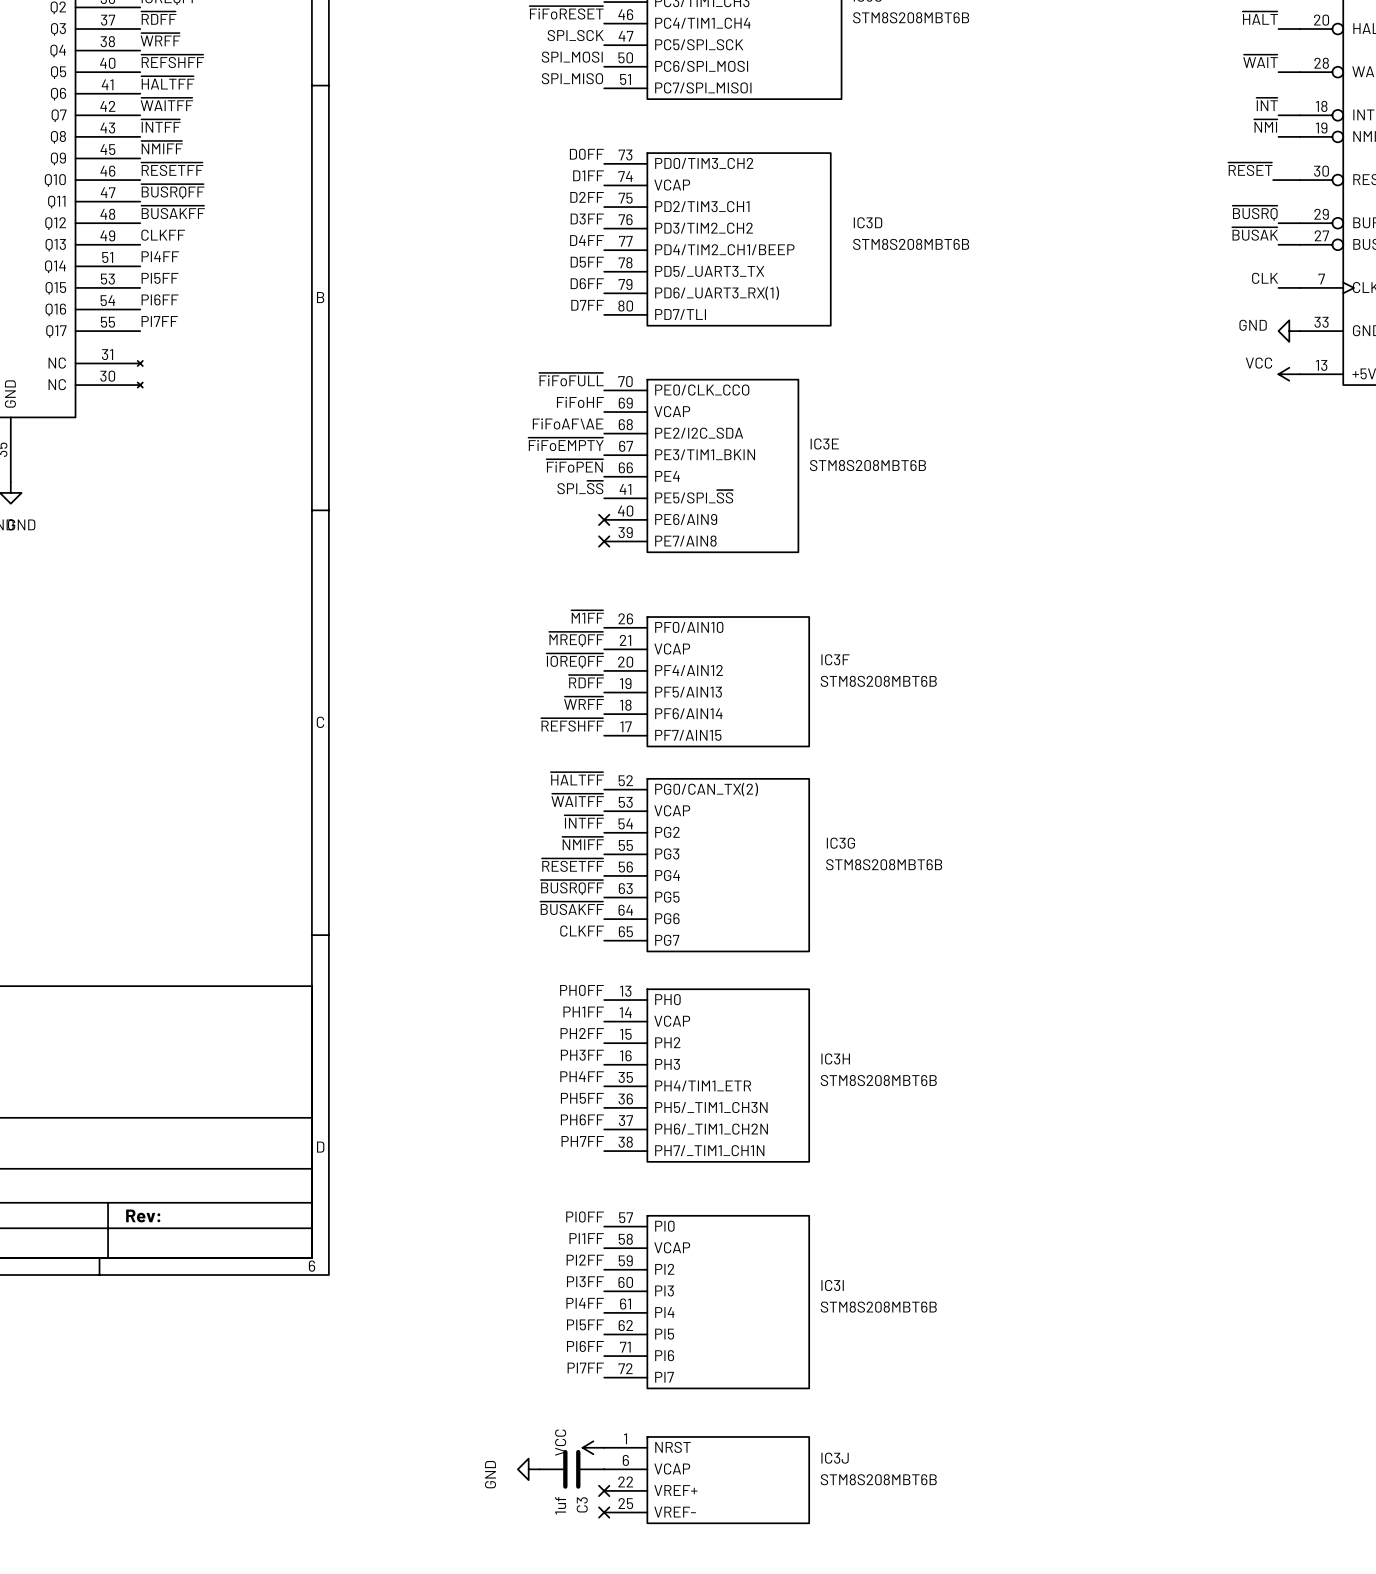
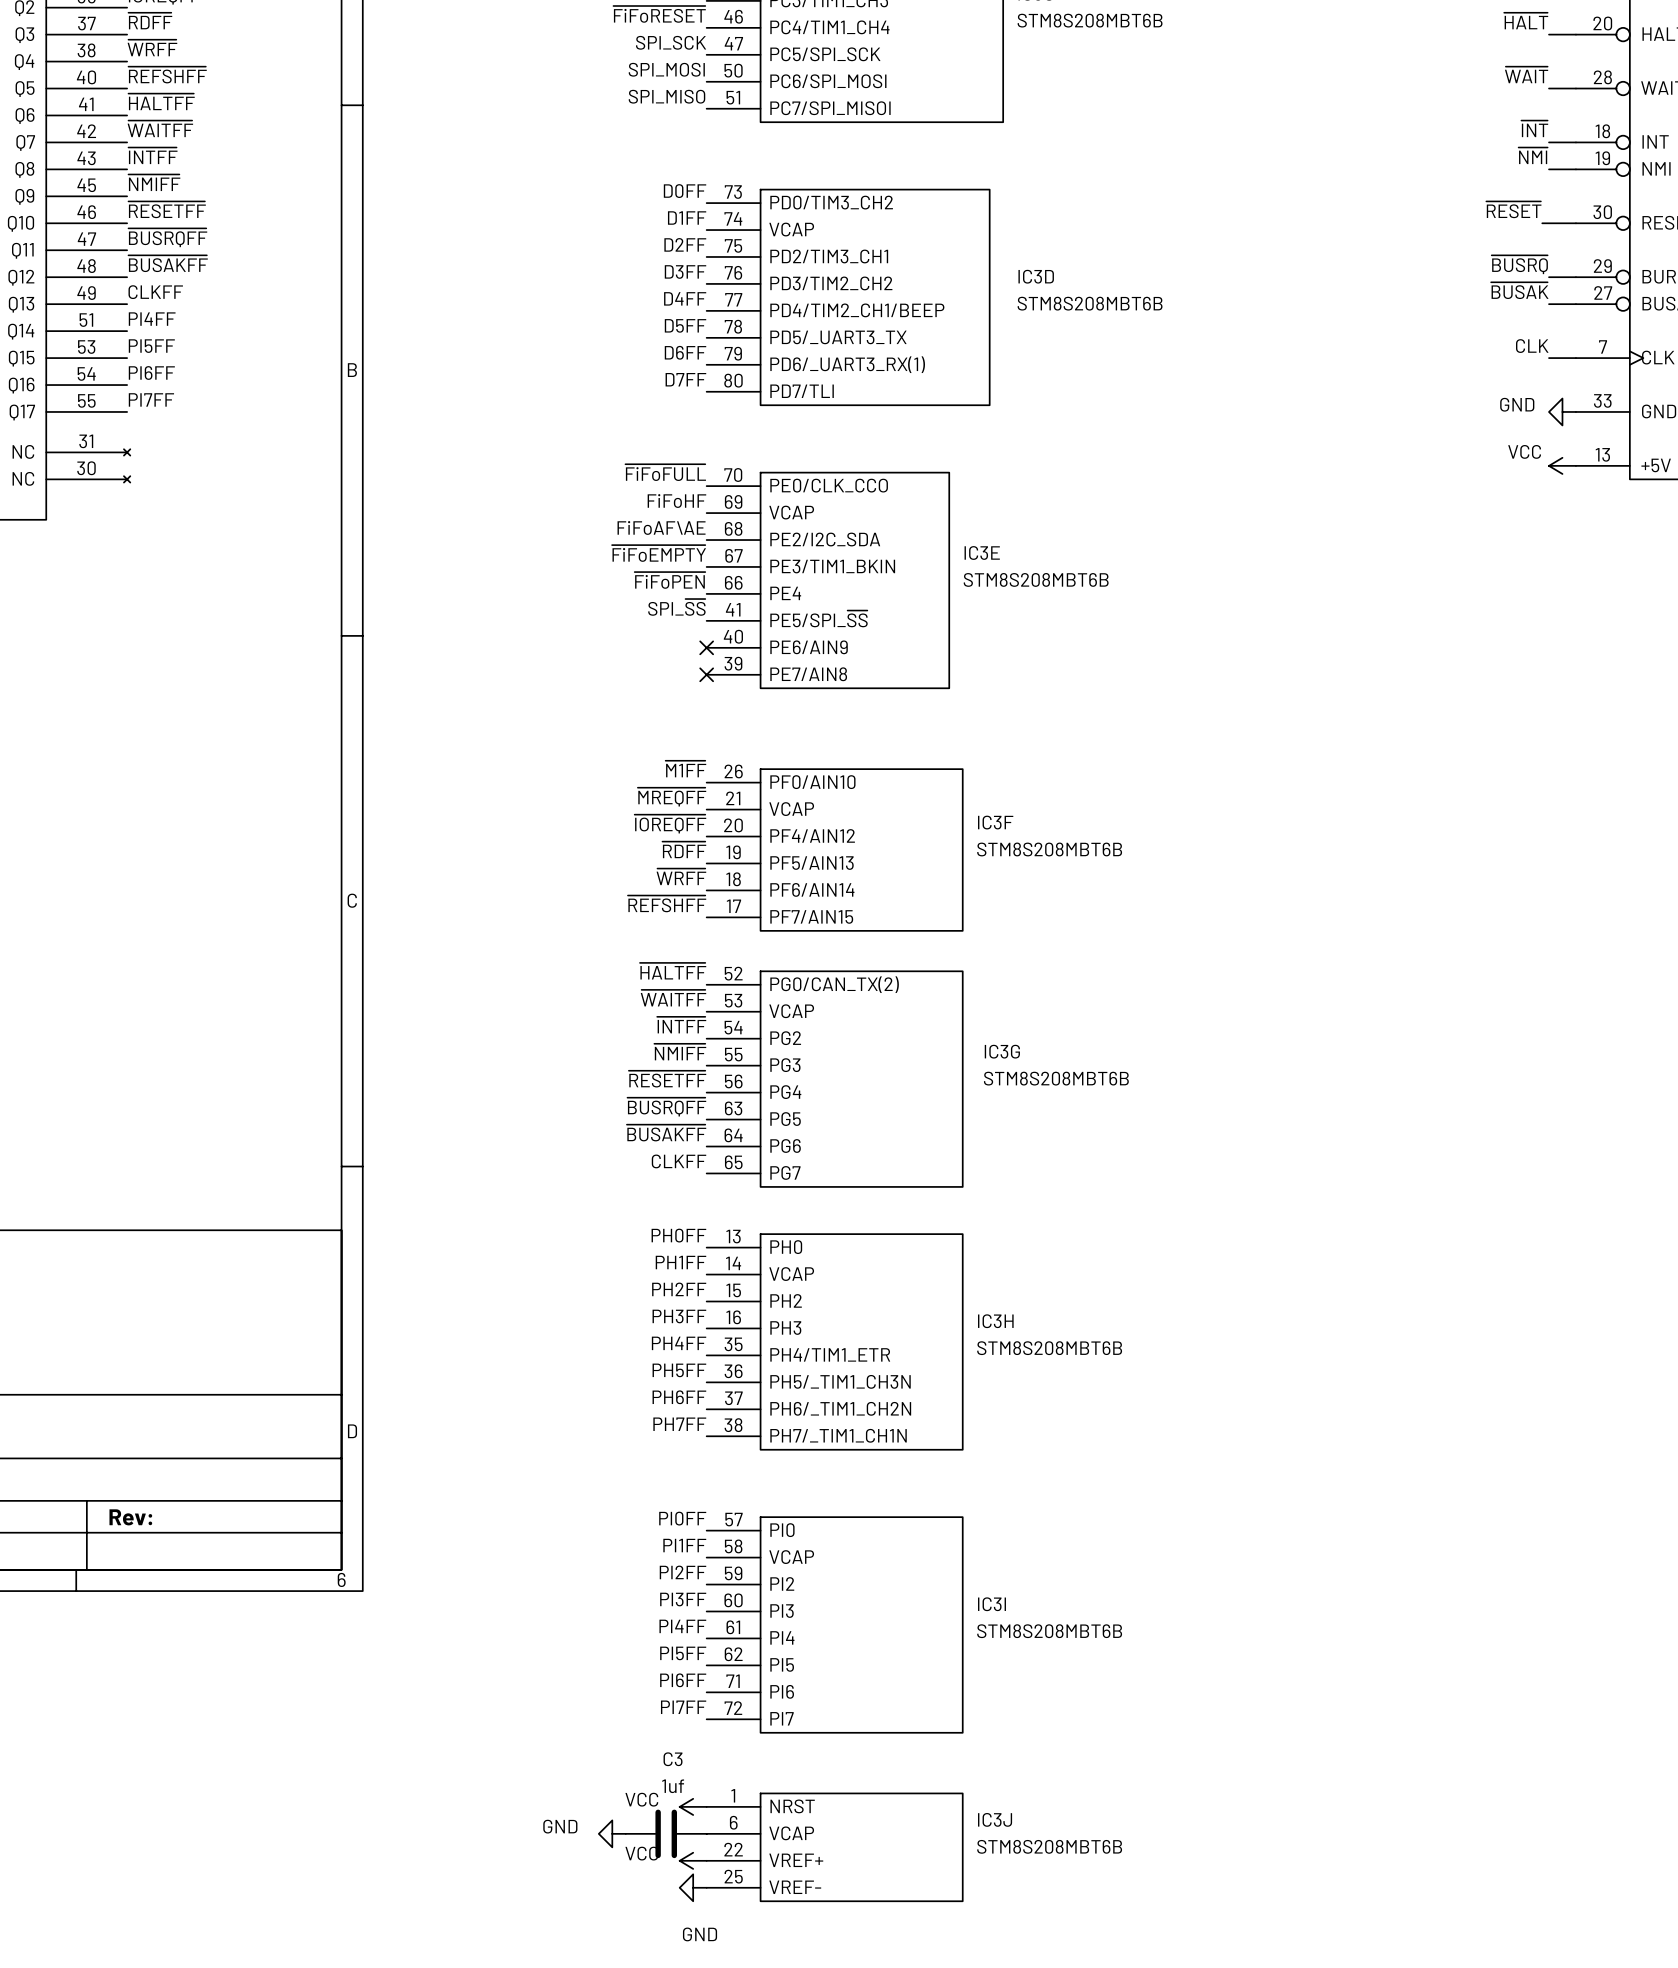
power symbol text rotation: 0° (560, 1442) -> 90° clockwise (641, 1799)
power symbol text rotation: 0° (490, 1474) -> 90° clockwise (560, 1826)
power symbol: none -> VCC (693, 1860)
no-connect mark: (604, 1490) -> none
C3 name rotation: 0° (582, 1504) -> 90° clockwise (673, 1759)
C3 name position: C3 (582, 1504) -> C3 (673, 1759)
C3 value rotation: 0° (560, 1505) -> 90° clockwise (673, 1786)
C3 value position: 1uf (560, 1505) -> 1uf (673, 1786)
power symbol: none -> GND (693, 1887)
no-connect mark: (604, 1512) -> none

